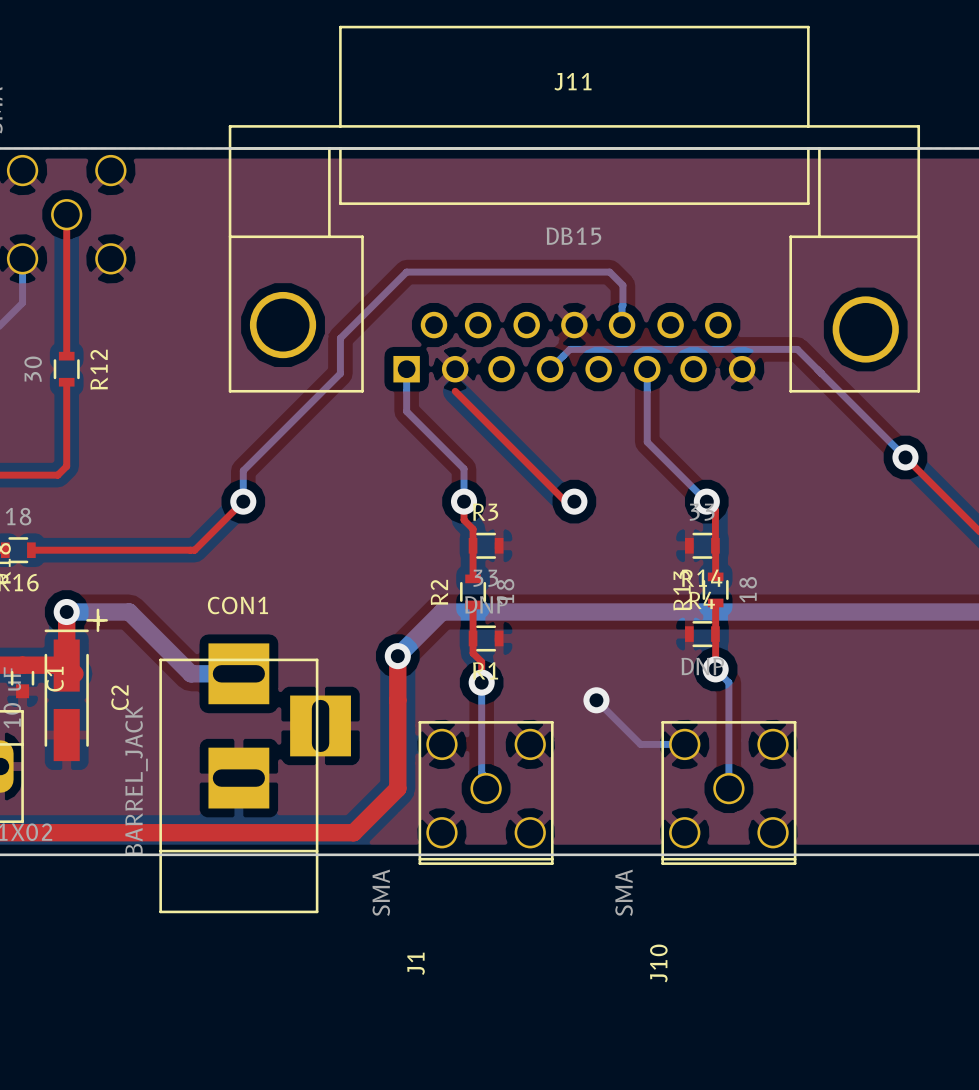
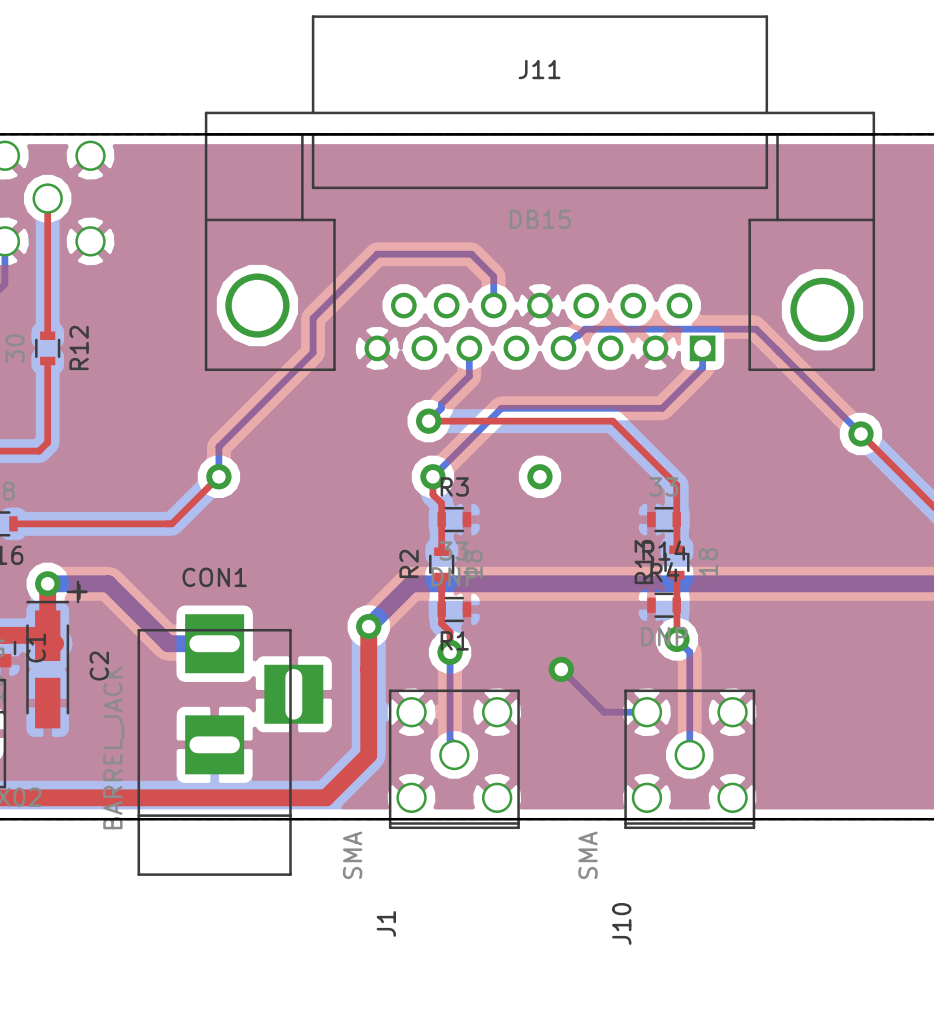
J11 footprint: [228, 25, 921, 393] -> [204, 15, 876, 372]
bottom track: (503, 272) (609, 272) (622, 285) (622, 325) -> (471, 254) (493, 276) (493, 305)
bottom track: (620, 349) (569, 349) (550, 369) -> (584, 329) (563, 348)
bottom track: (406, 369) (406, 411) (464, 468) (464, 501) -> (702, 348) (702, 367) (662, 408) (501, 408) (432, 476)
bottom track: none -> (469, 348) (469, 376) (441, 404) (441, 408) (428, 421)
bottom track: (647, 369) (647, 442) (706, 501) -> none
top track: (455, 391) (565, 501) -> none
top track: none -> (428, 421) (612, 421) (668, 476)
via: none -> (428, 421)
via: (706, 501) -> none

